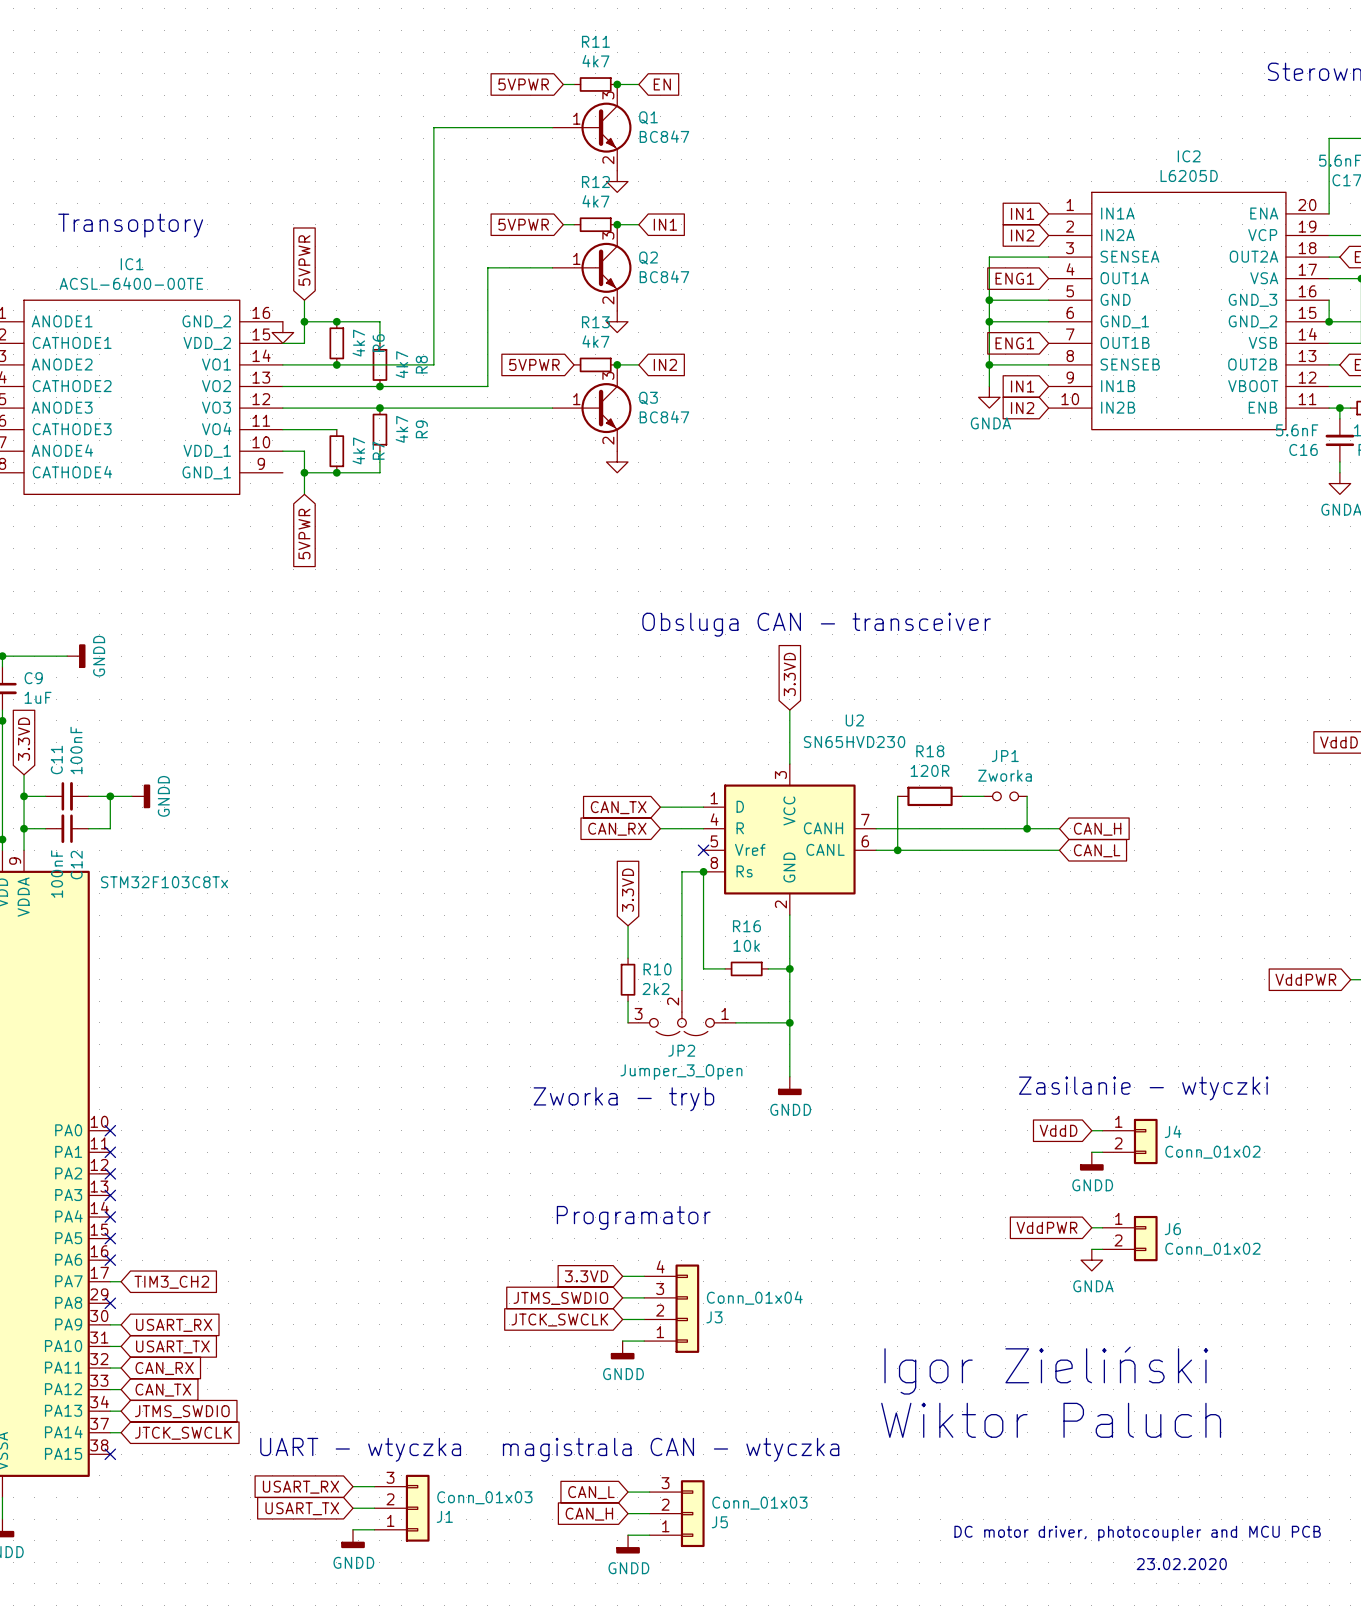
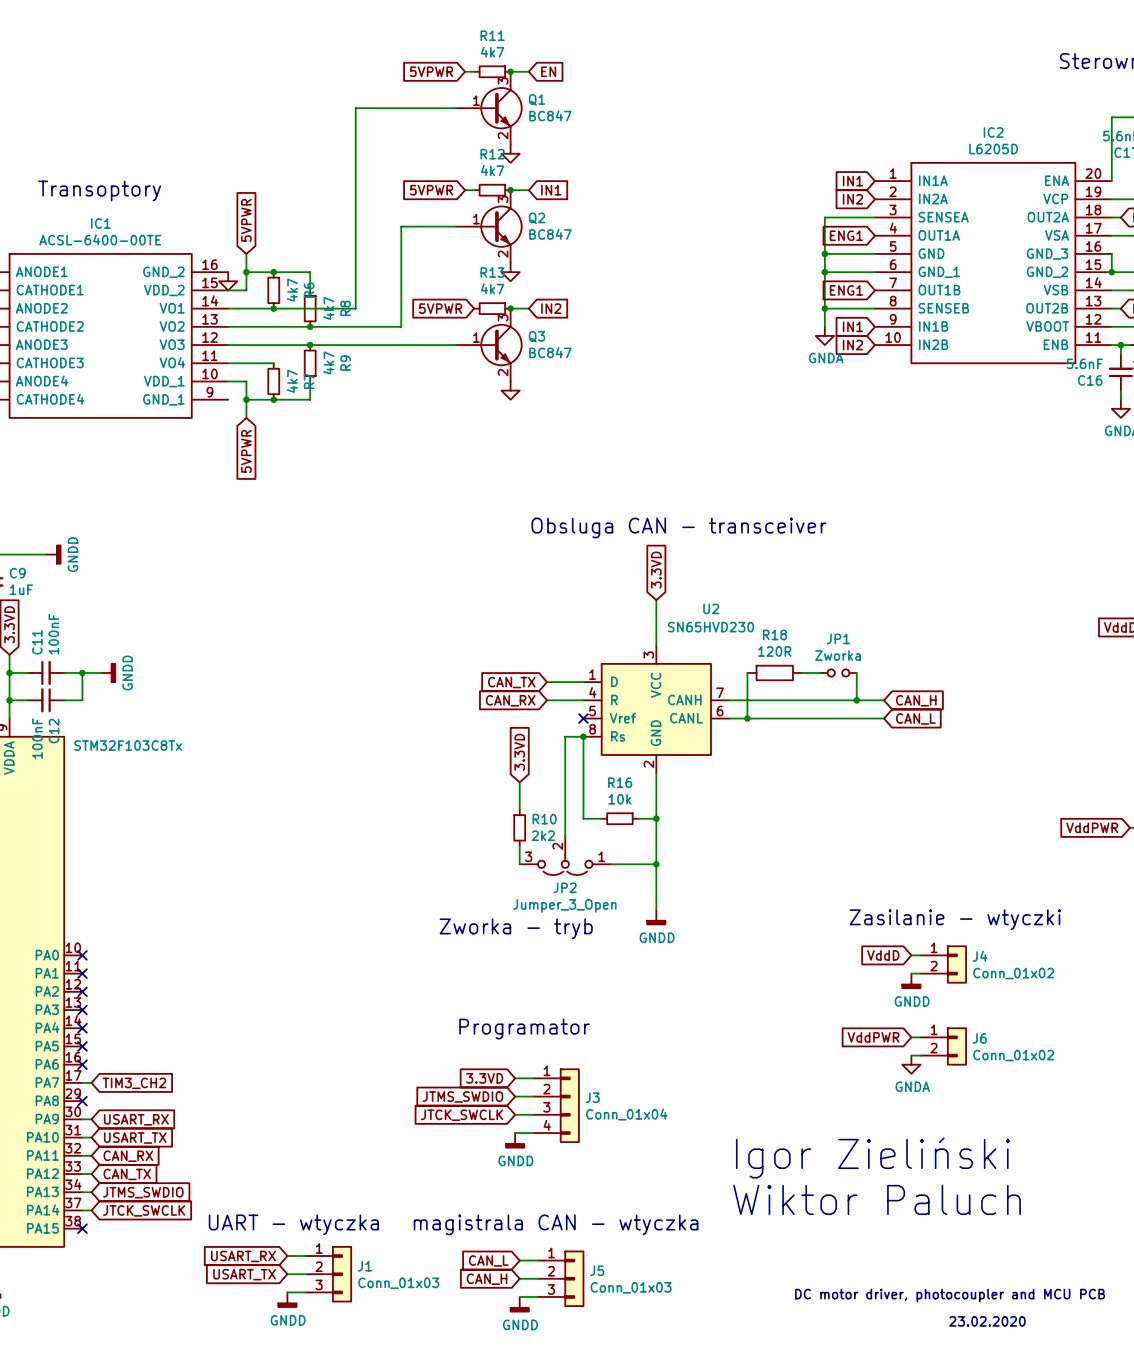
J3 flip: as is (687, 1308) -> up-down (569, 1105)
J1 flip: as is (417, 1508) -> up-down (342, 1274)
J5 flip: as is (692, 1513) -> up-down (574, 1278)

